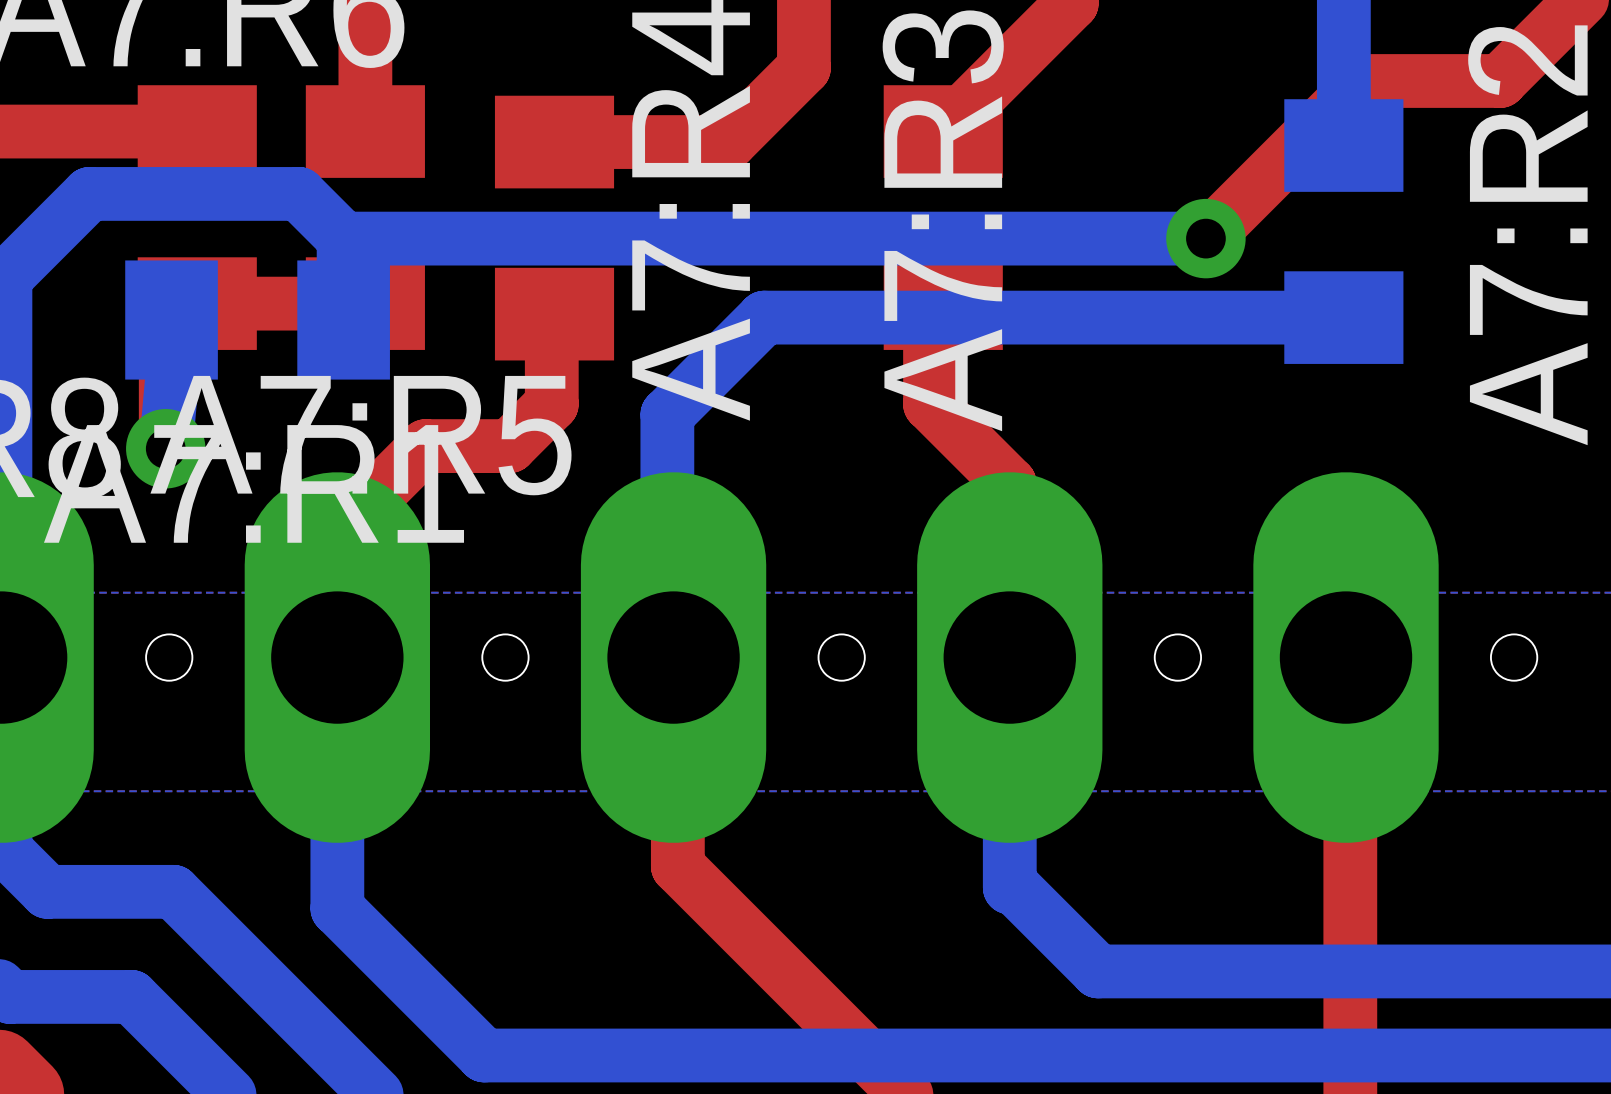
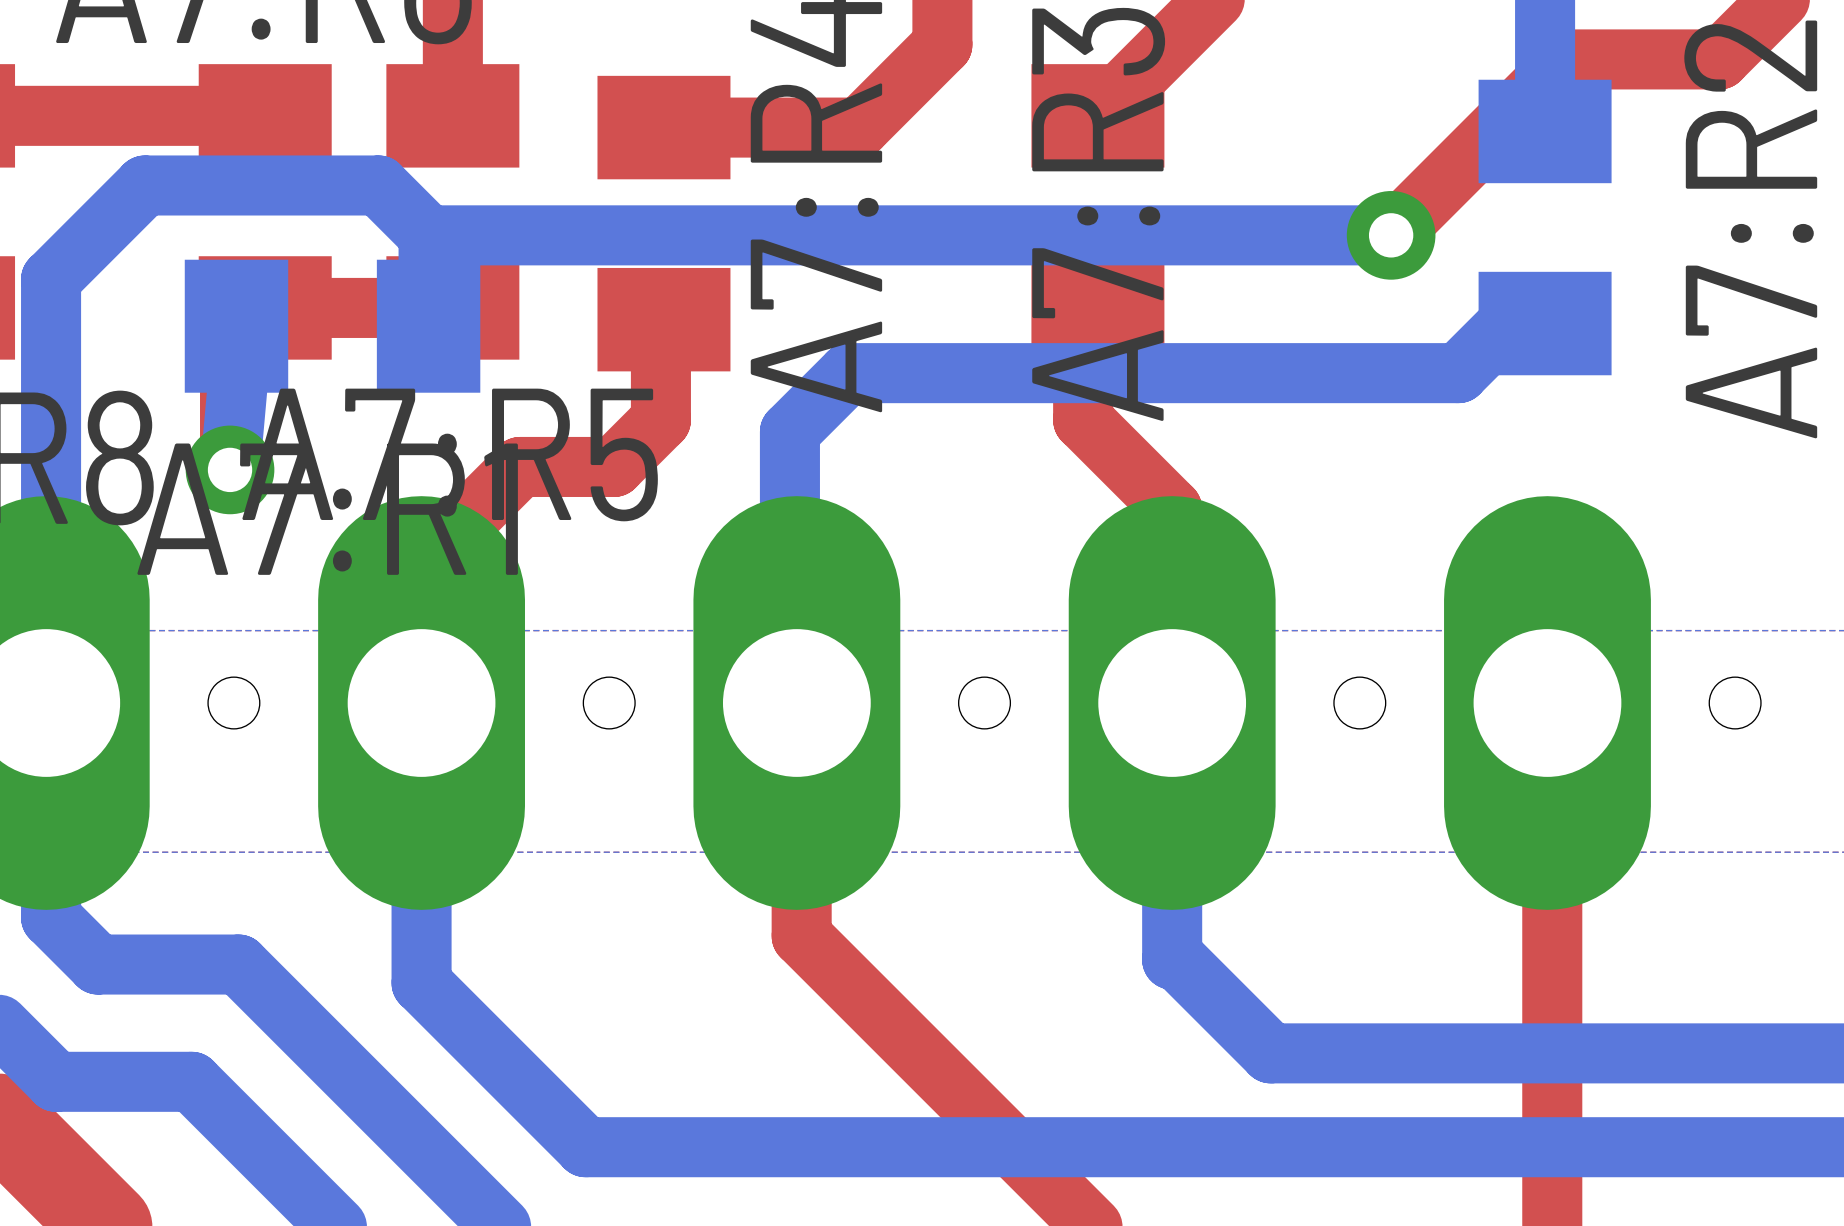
bottom track: (1310, 317) (764, 317) (719, 362) -> (1508, 323) (1458, 373) (848, 373)

